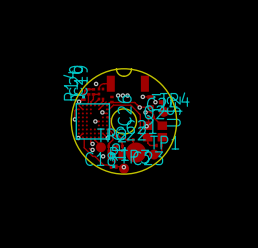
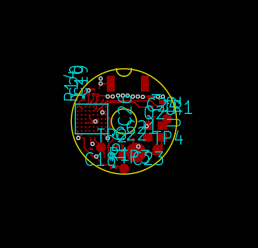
via: none -> (100, 78)
via: (96, 83) -> none
via: none -> (100, 83)
via: none -> (88, 90)
part: (100, 94) -> none
track: none -> (107, 96) (96, 96) (96, 107) (93, 110)
via: none -> (107, 96)
via: none -> (112, 96)
via: none -> (132, 96)
via: none -> (137, 96)
via: none -> (157, 96)
via: none -> (162, 96)
via: (79, 101) -> none
via: (155, 102) -> none
part footprint: [76, 103, 110, 139] -> [75, 104, 108, 134]
track: none -> (163, 106) (157, 106) (151, 100) (107, 100) (102, 105) (101, 110)
via: (139, 107) -> none
track: (78, 109) (74, 110) (74, 119) -> none
track: (106, 109) (113, 105) (130, 105) (140, 114) (140, 133) (143, 137) (147, 137) (147, 143) (150, 145) (156, 145) -> none
TP4 position: (163, 111) -> (157, 149)
track: (145, 112) (150, 111) (162, 125) -> none
via: (145, 112) -> none
track: none -> (89, 114) (92, 122)
track: none -> (97, 118) (97, 122) (85, 122)
via: (74, 119) -> none
track: (110, 127) (120, 137) (128, 139) -> none
track: (106, 129) (122, 143) (122, 145) -> none
track: none -> (77, 130) (79, 136)
track: none -> (101, 130) (101, 150) (104, 152) (104, 157)
track: (117, 146) (113, 146) (115, 146) (115, 161) (112, 161) -> none
via: none -> (138, 146)
via: (92, 149) -> none
TP1 position: (154, 154) -> (167, 118)
via: none -> (96, 156)
via: (103, 156) -> none
via: (123, 167) -> none

